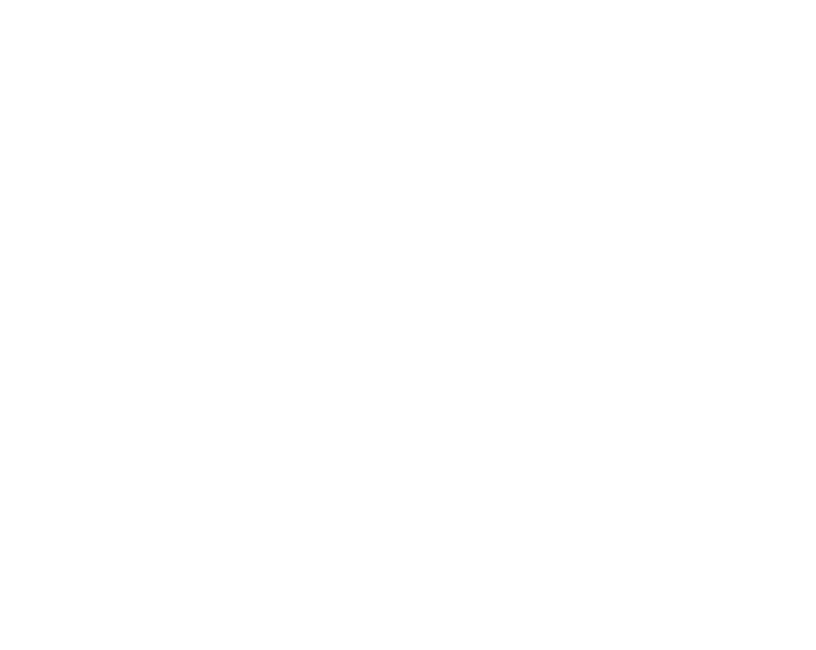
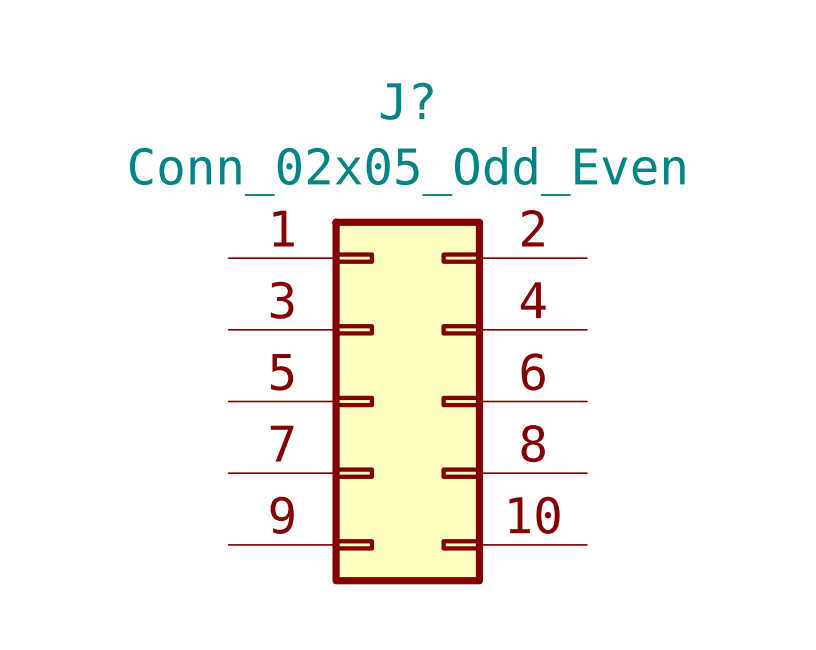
J?: none -> Conn_02x05_Odd_Even (407, 401)

